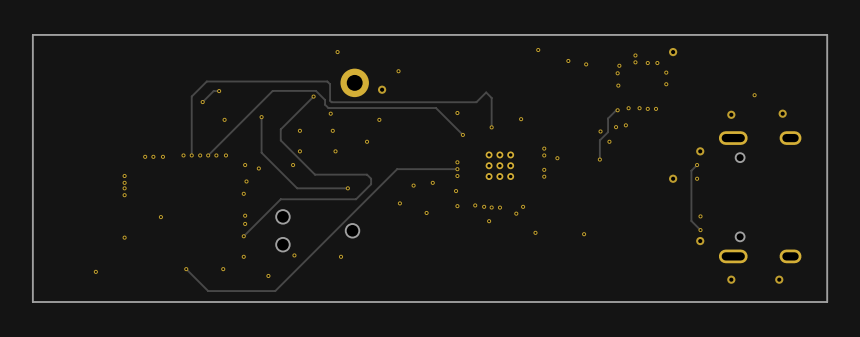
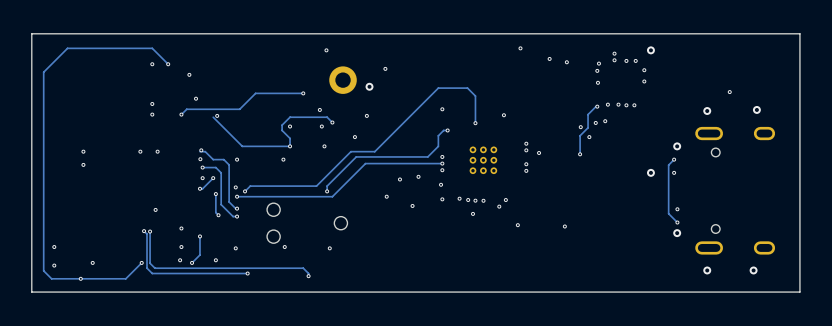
via: none -> (152, 64)
track: none -> (168, 64) (152, 48) (67, 48) (43, 72) (43, 270) (51, 278) (125, 278) (141, 262)
via: none -> (168, 64)
via: none -> (189, 74)
track: (219, 91) (213, 91) (202, 102) -> none
via: (219, 91) -> none
track: (313, 96) (280, 129) (280, 140) (314, 174) (367, 174) (371, 178) (371, 184) (356, 199) (280, 199) (243, 236) -> (303, 93) (255, 93) (239, 109) (186, 109) (181, 114)
track: (491, 99) (486, 92) (476, 102) (331, 102) (330, 84) (327, 81) (206, 81) (191, 96) (191, 155) -> (475, 96) (467, 88) (438, 88) (374, 151) (350, 151) (316, 186) (250, 186) (245, 191)
via: none -> (152, 103)
track: (261, 117) (261, 152) (297, 188) (347, 188) -> none
via: (261, 117) -> none
via: none -> (152, 114)
via: none -> (181, 114)
track: none -> (213, 117) (242, 146) (290, 146) (290, 138) (282, 130) (282, 125) (290, 117) (327, 117) (332, 122)
via: none -> (332, 122)
track: (462, 134) (436, 108) (328, 108) (325, 104) (325, 100) (315, 90) (272, 90) (208, 155) -> (447, 130) (443, 130) (438, 135) (438, 146) (427, 156) (356, 156) (327, 186) (327, 191)
via: (183, 155) -> none
via: (191, 155) -> none
via: (200, 155) -> none
via: (216, 155) -> none
via: (225, 155) -> none
via: none -> (83, 151)
via: (153, 156) -> none
track: none -> (199, 151) (205, 151) (213, 159) (223, 159) (229, 164) (229, 201) (237, 208)
via: none -> (200, 159)
via: (258, 168) -> none
track: (397, 169) (275, 291) (208, 291) (186, 269) -> (384, 163) (365, 163) (332, 196) (237, 196)
via: none -> (83, 164)
track: none -> (202, 167) (215, 167) (221, 172) (221, 204) (233, 216) (237, 216)
via: none -> (202, 167)
via: (124, 176) -> none
via: (246, 181) -> none
via: (124, 182) -> none
via: none -> (202, 178)
track: none -> (213, 178) (202, 188) (199, 188)
via: none -> (213, 178)
via: (124, 188) -> none
via position: (347, 188) -> (327, 191)
via: (124, 195) -> none
via: none -> (199, 188)
via: none -> (245, 191)
track: none -> (215, 194) (215, 212) (218, 215)
via: none -> (215, 194)
via: none -> (237, 196)
via: none -> (218, 215)
via: none -> (181, 228)
via: (243, 236) -> none
via: (124, 237) -> none
track: none -> (144, 231) (147, 234) (147, 268) (152, 273) (247, 273)
via: none -> (144, 231)
track: none -> (150, 231) (150, 263) (154, 268) (303, 268) (308, 276)
via: none -> (150, 231)
track: none -> (199, 236) (199, 254) (192, 262)
via: none -> (199, 236)
via: none -> (54, 247)
via: none -> (181, 247)
via: none -> (141, 262)
via: none -> (192, 262)
via: none -> (54, 265)
via position: (268, 275) -> (247, 273)
via: none -> (308, 276)
via: none -> (80, 278)

